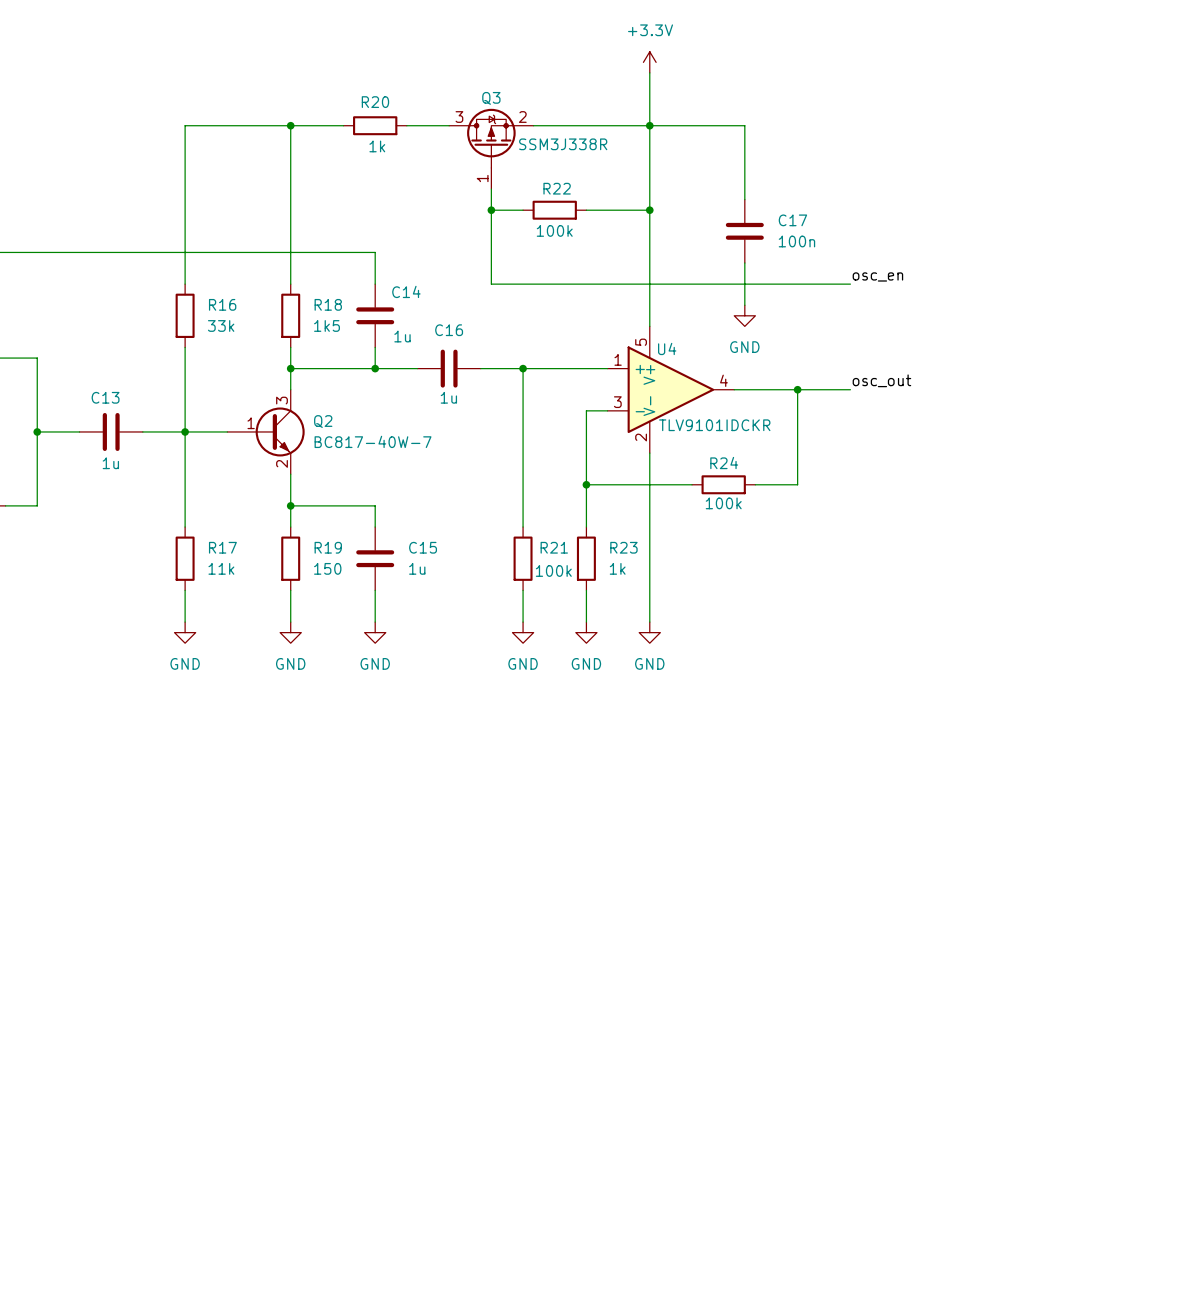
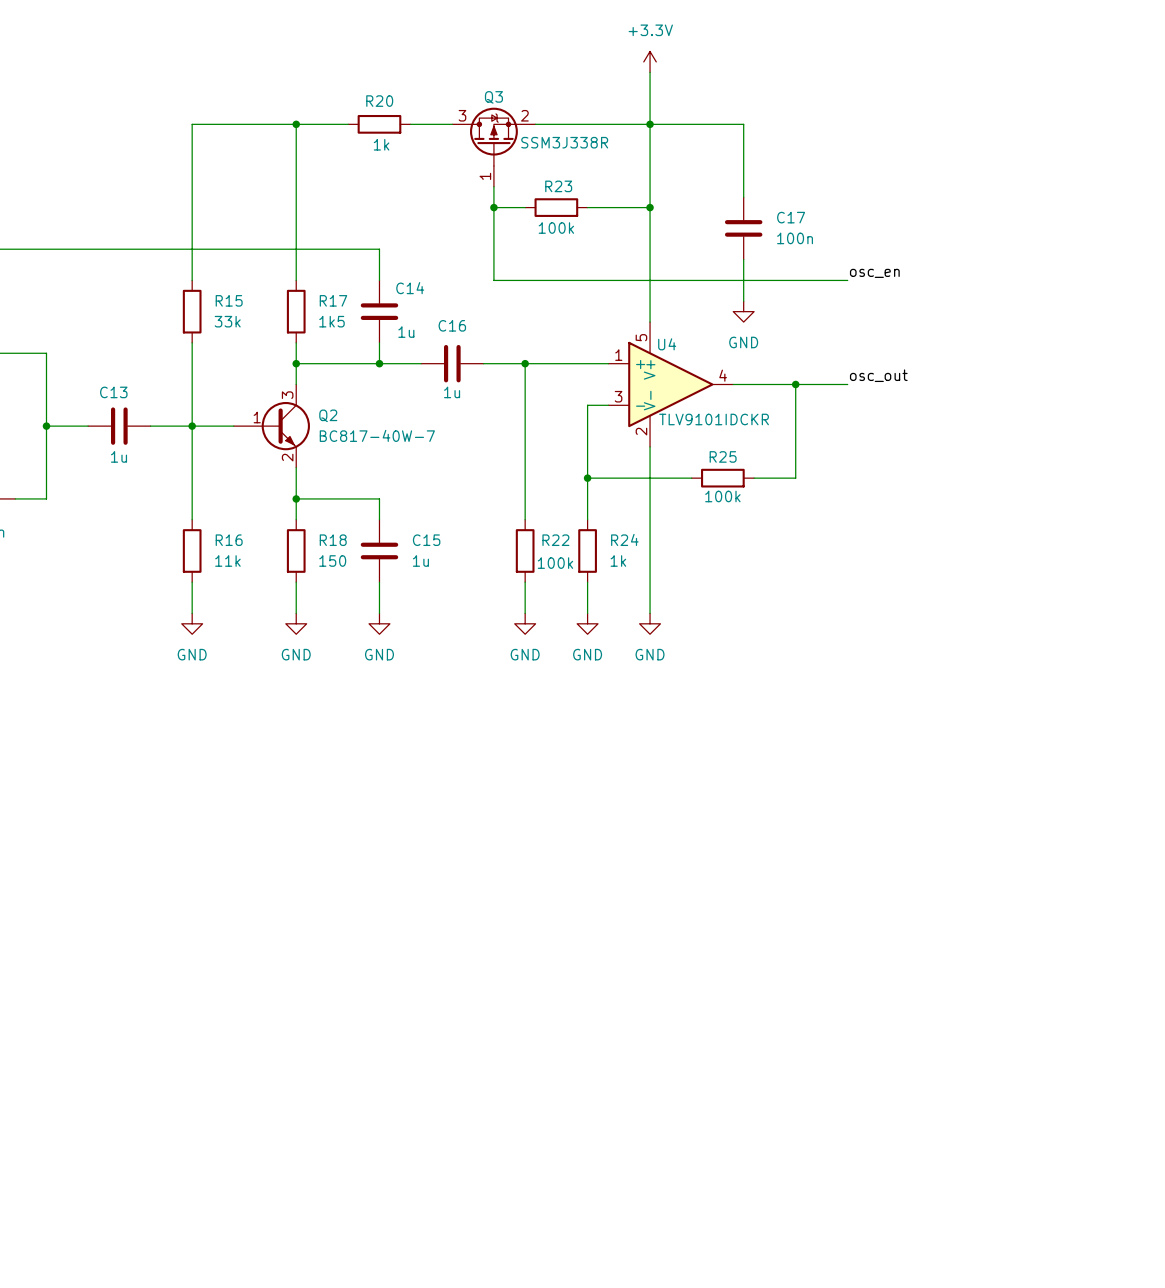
R22 name: R22 (557, 188) -> R23 (558, 186)
R16 name: R16 (222, 304) -> R15 (229, 300)
R18 name: R18 (328, 304) -> R17 (333, 300)
R24 name: R24 (724, 463) -> R25 (723, 456)
R17 name: R17 (222, 547) -> R16 (229, 540)
R19 name: R19 (328, 547) -> R18 (333, 540)
R21 name: R21 (554, 547) -> R22 (555, 540)
R23 name: R23 (623, 547) -> R24 (624, 539)

